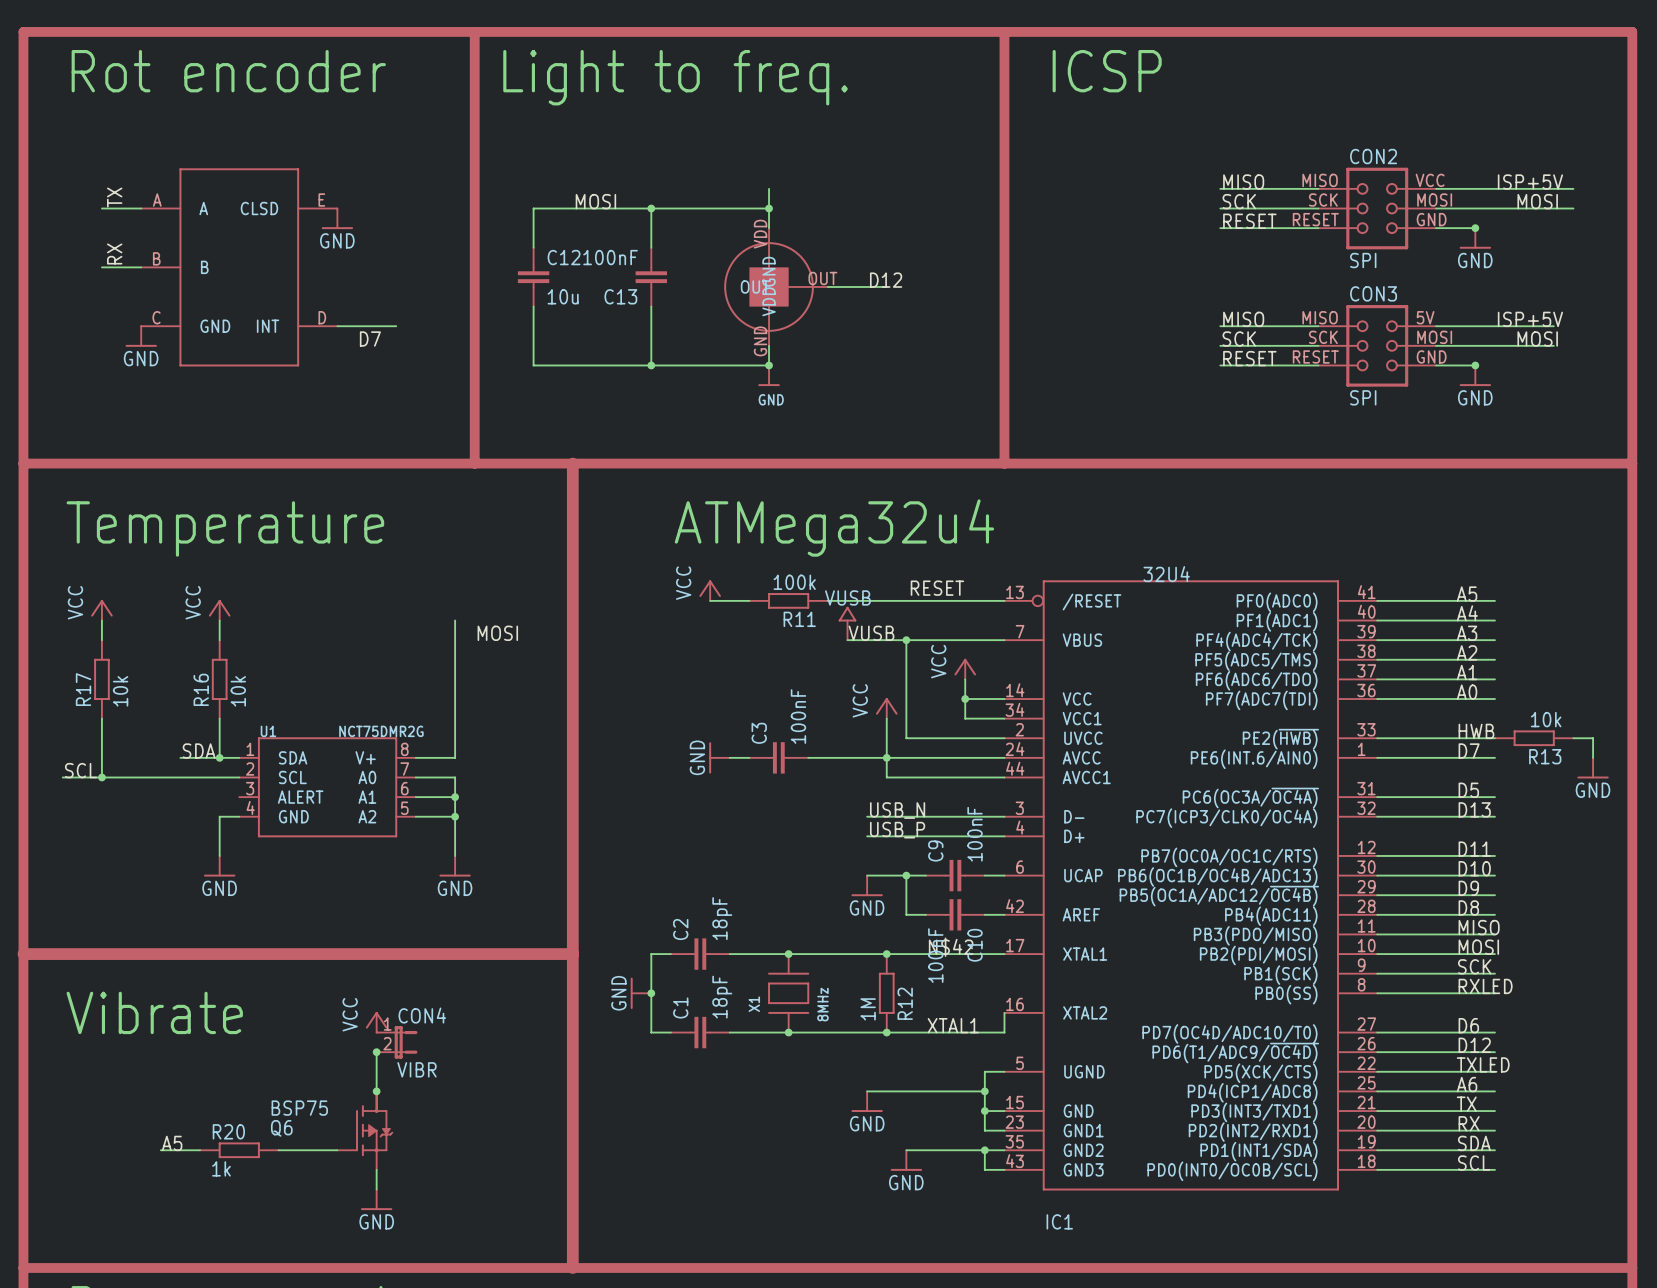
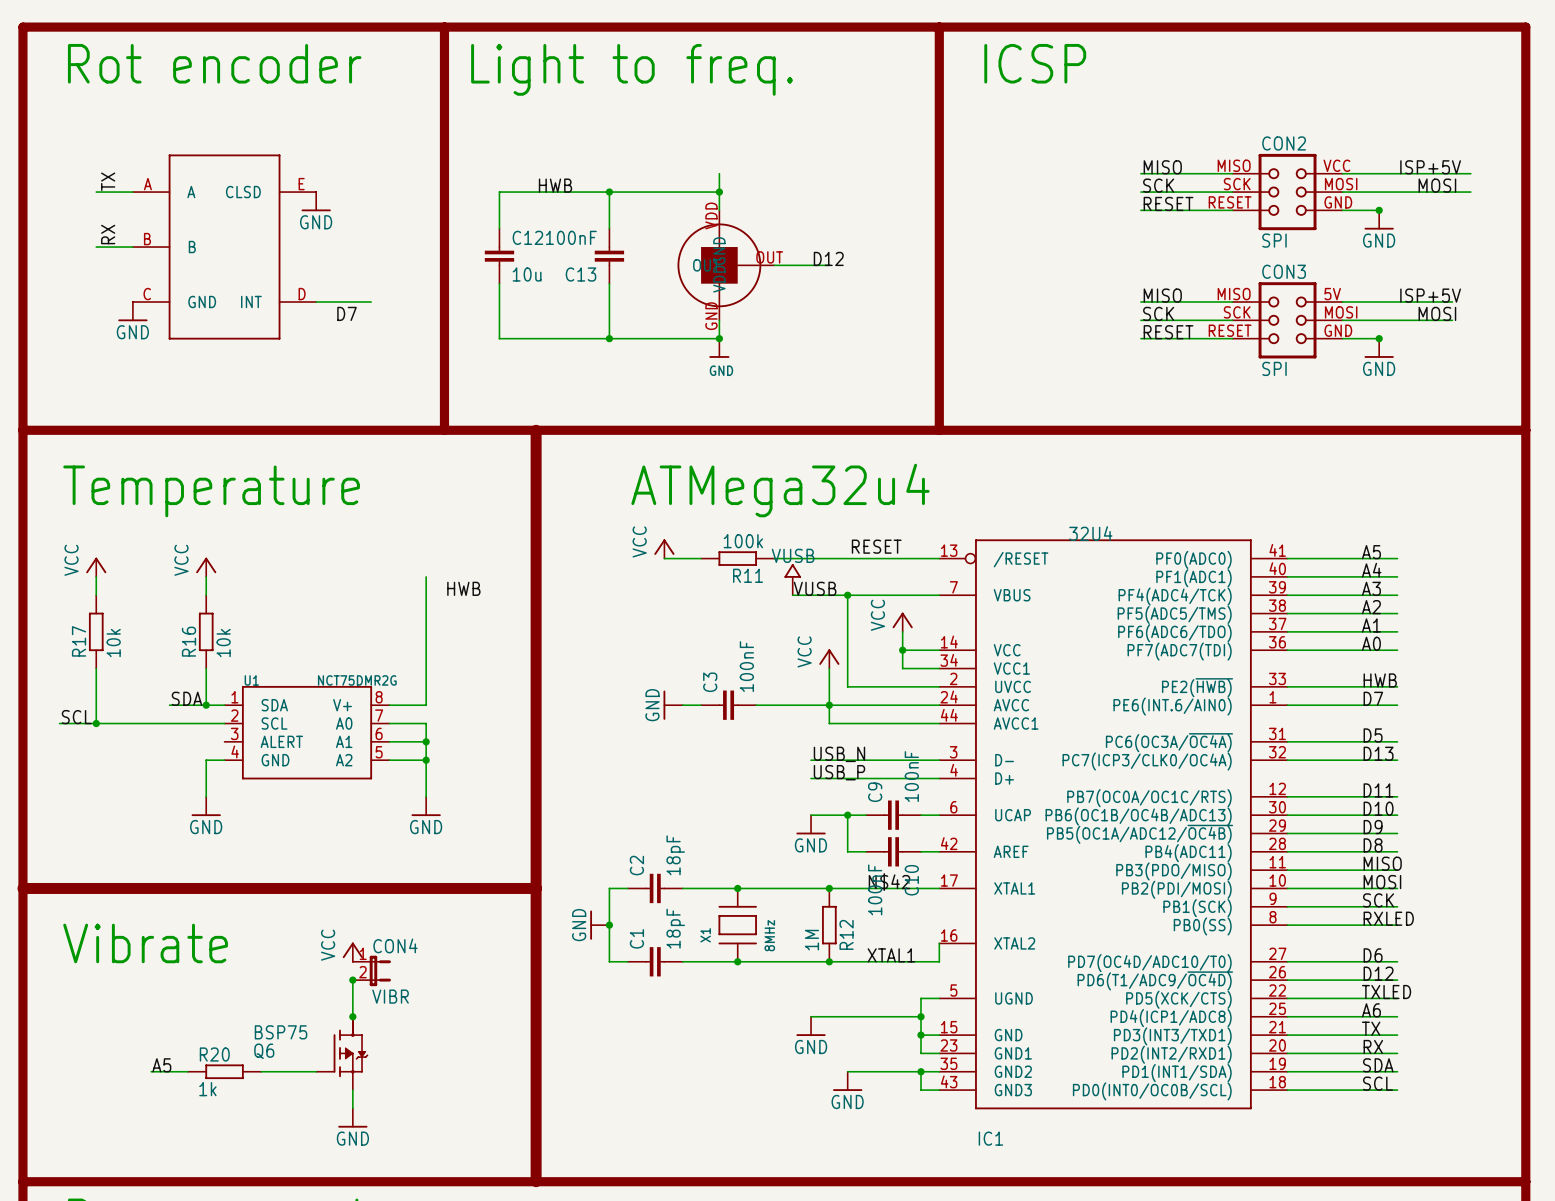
label: MOSI (595, 201) -> HWB (555, 185)
label: MOSI (497, 633) -> HWB (463, 588)
R13: 10k (1534, 738) -> none
wire: (1573, 738) (1593, 738) (1593, 757) -> none
power symbol: GND (1593, 768) -> none

